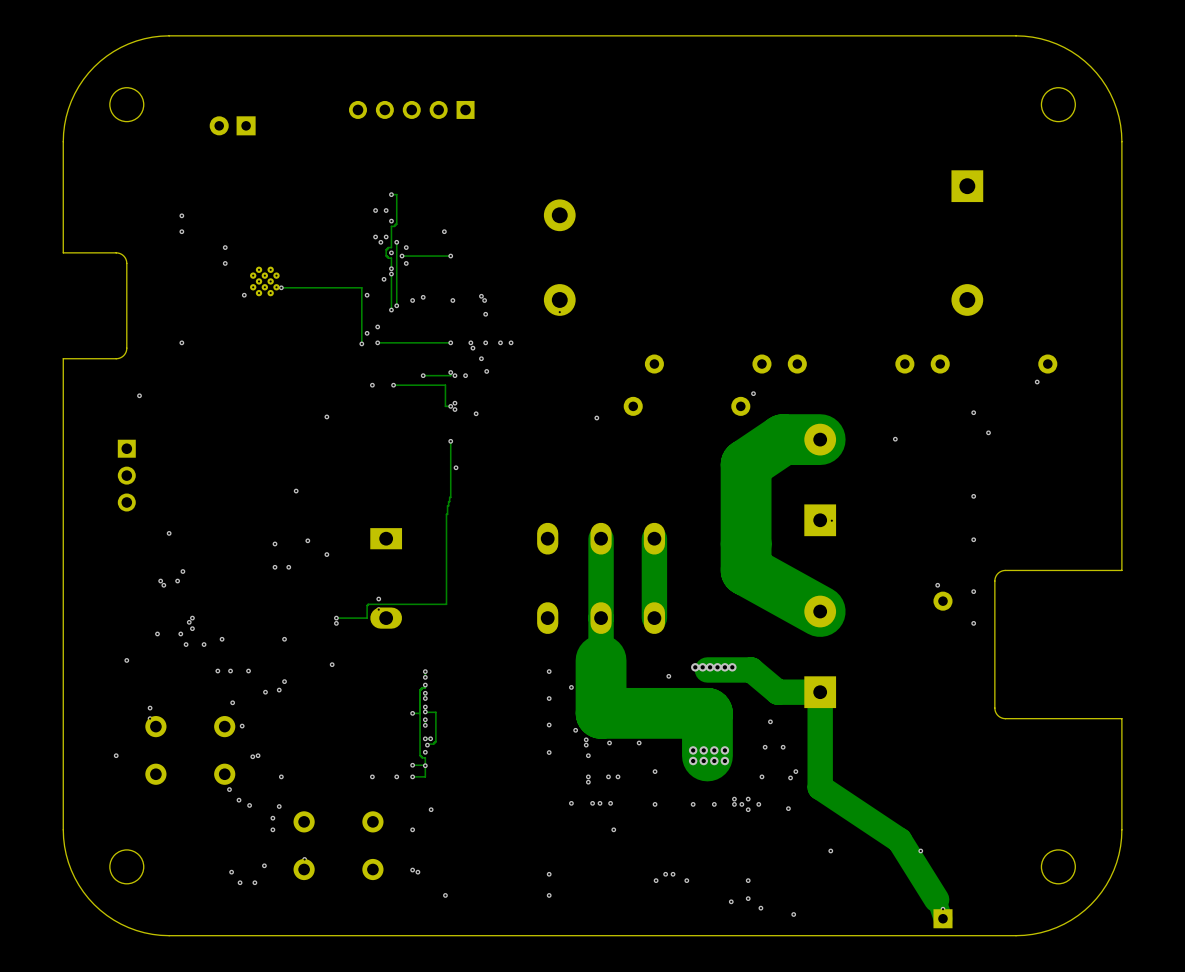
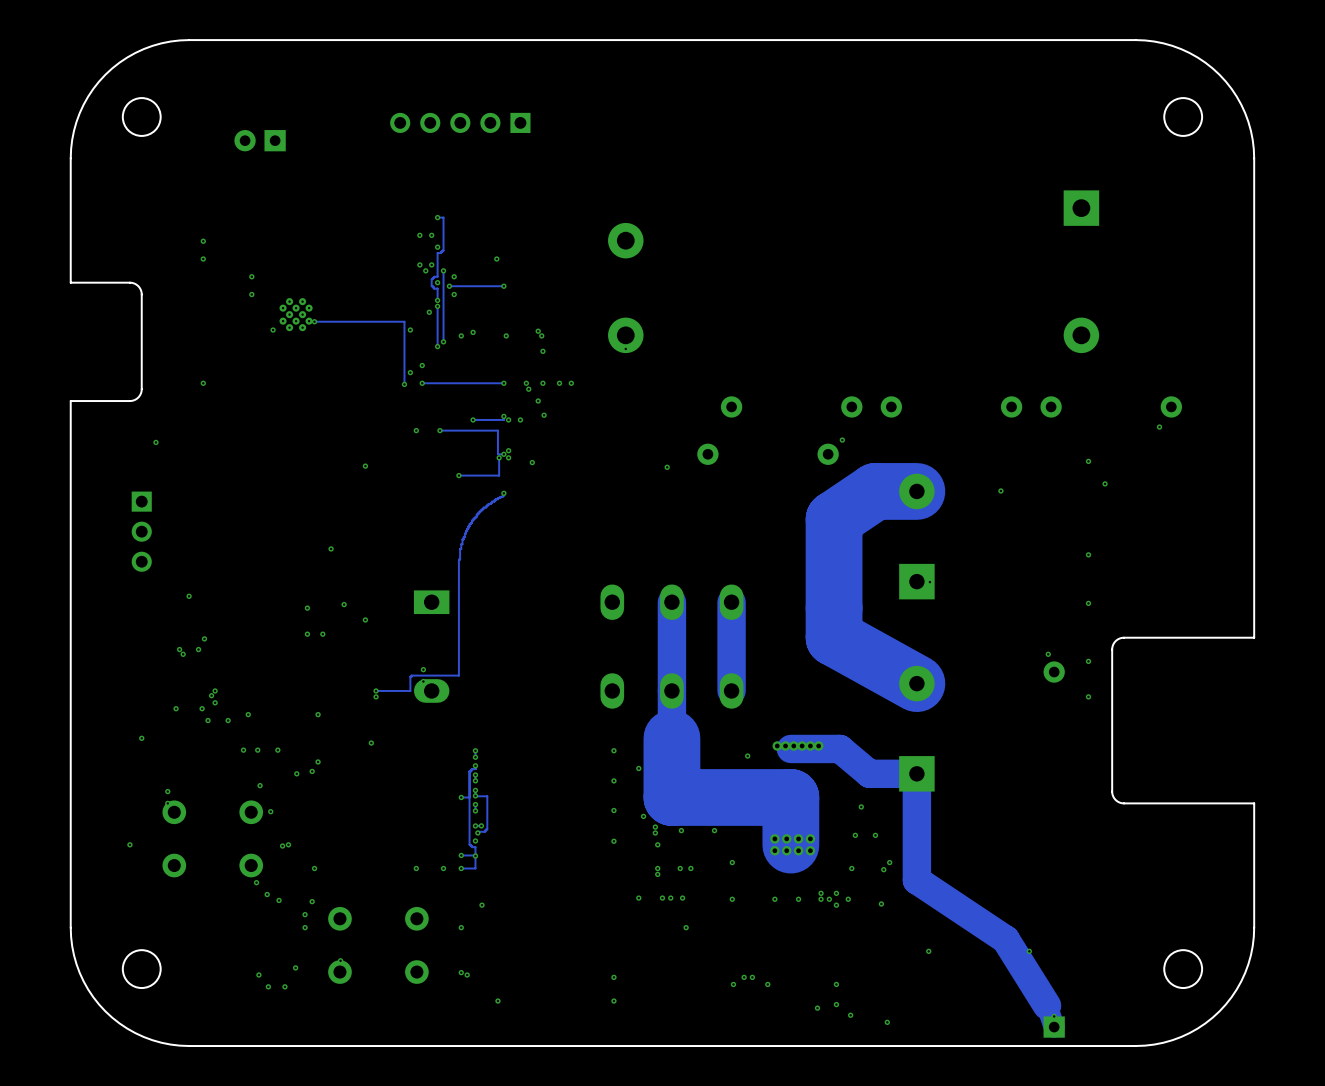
track: none -> (499, 457) (499, 475) (458, 475)
via: none -> (499, 457)
via: none -> (458, 475)
track: (450, 443) (450, 497) (446, 514) (446, 604) (410, 604) -> (503, 495) (488, 503) (476, 514) (462, 539) (458, 559) (458, 675)
via: (456, 467) -> none

